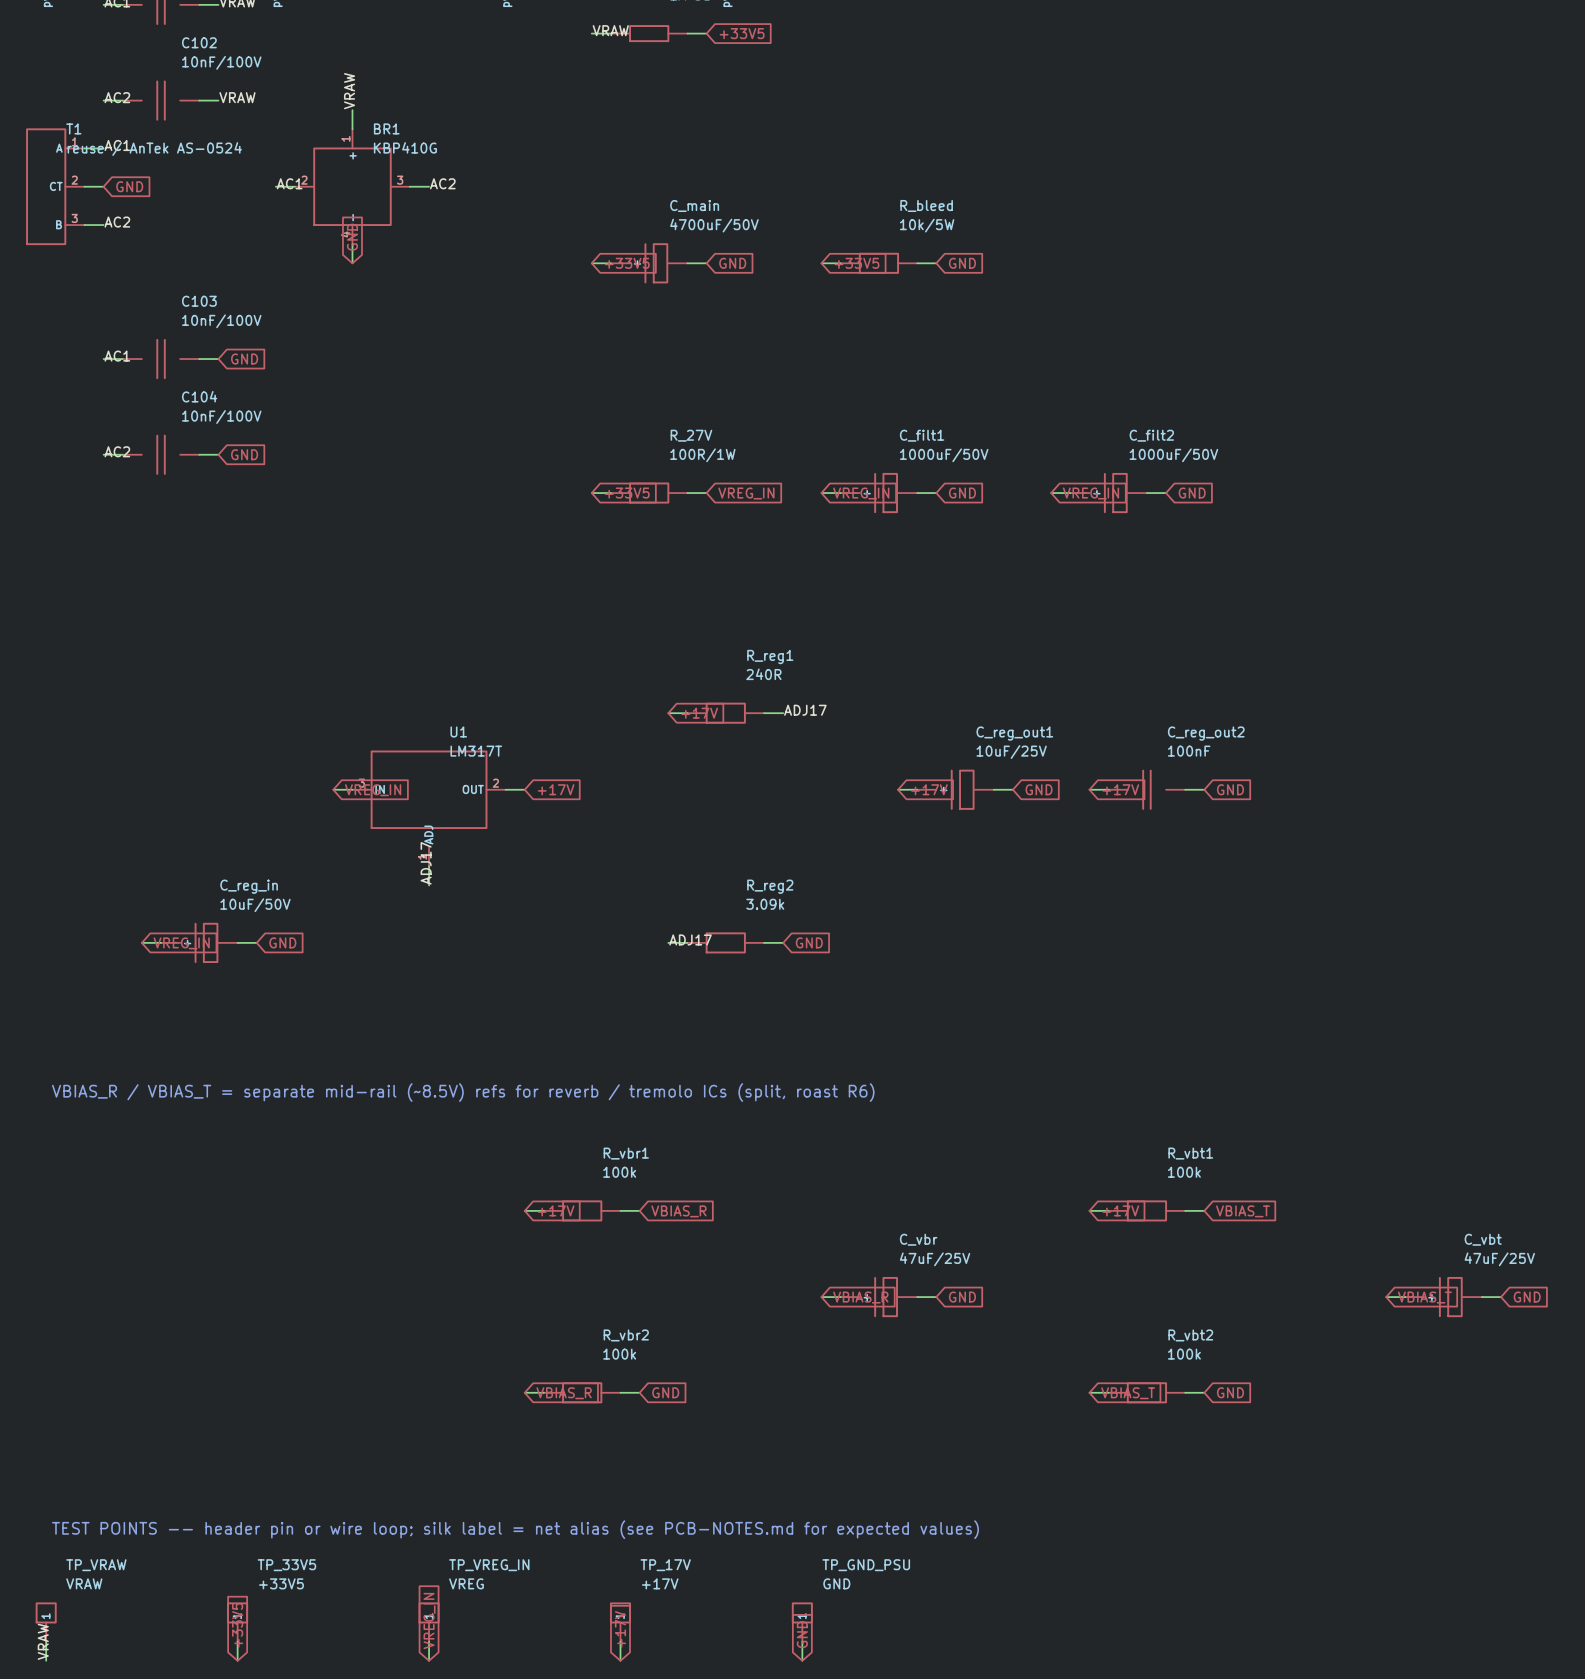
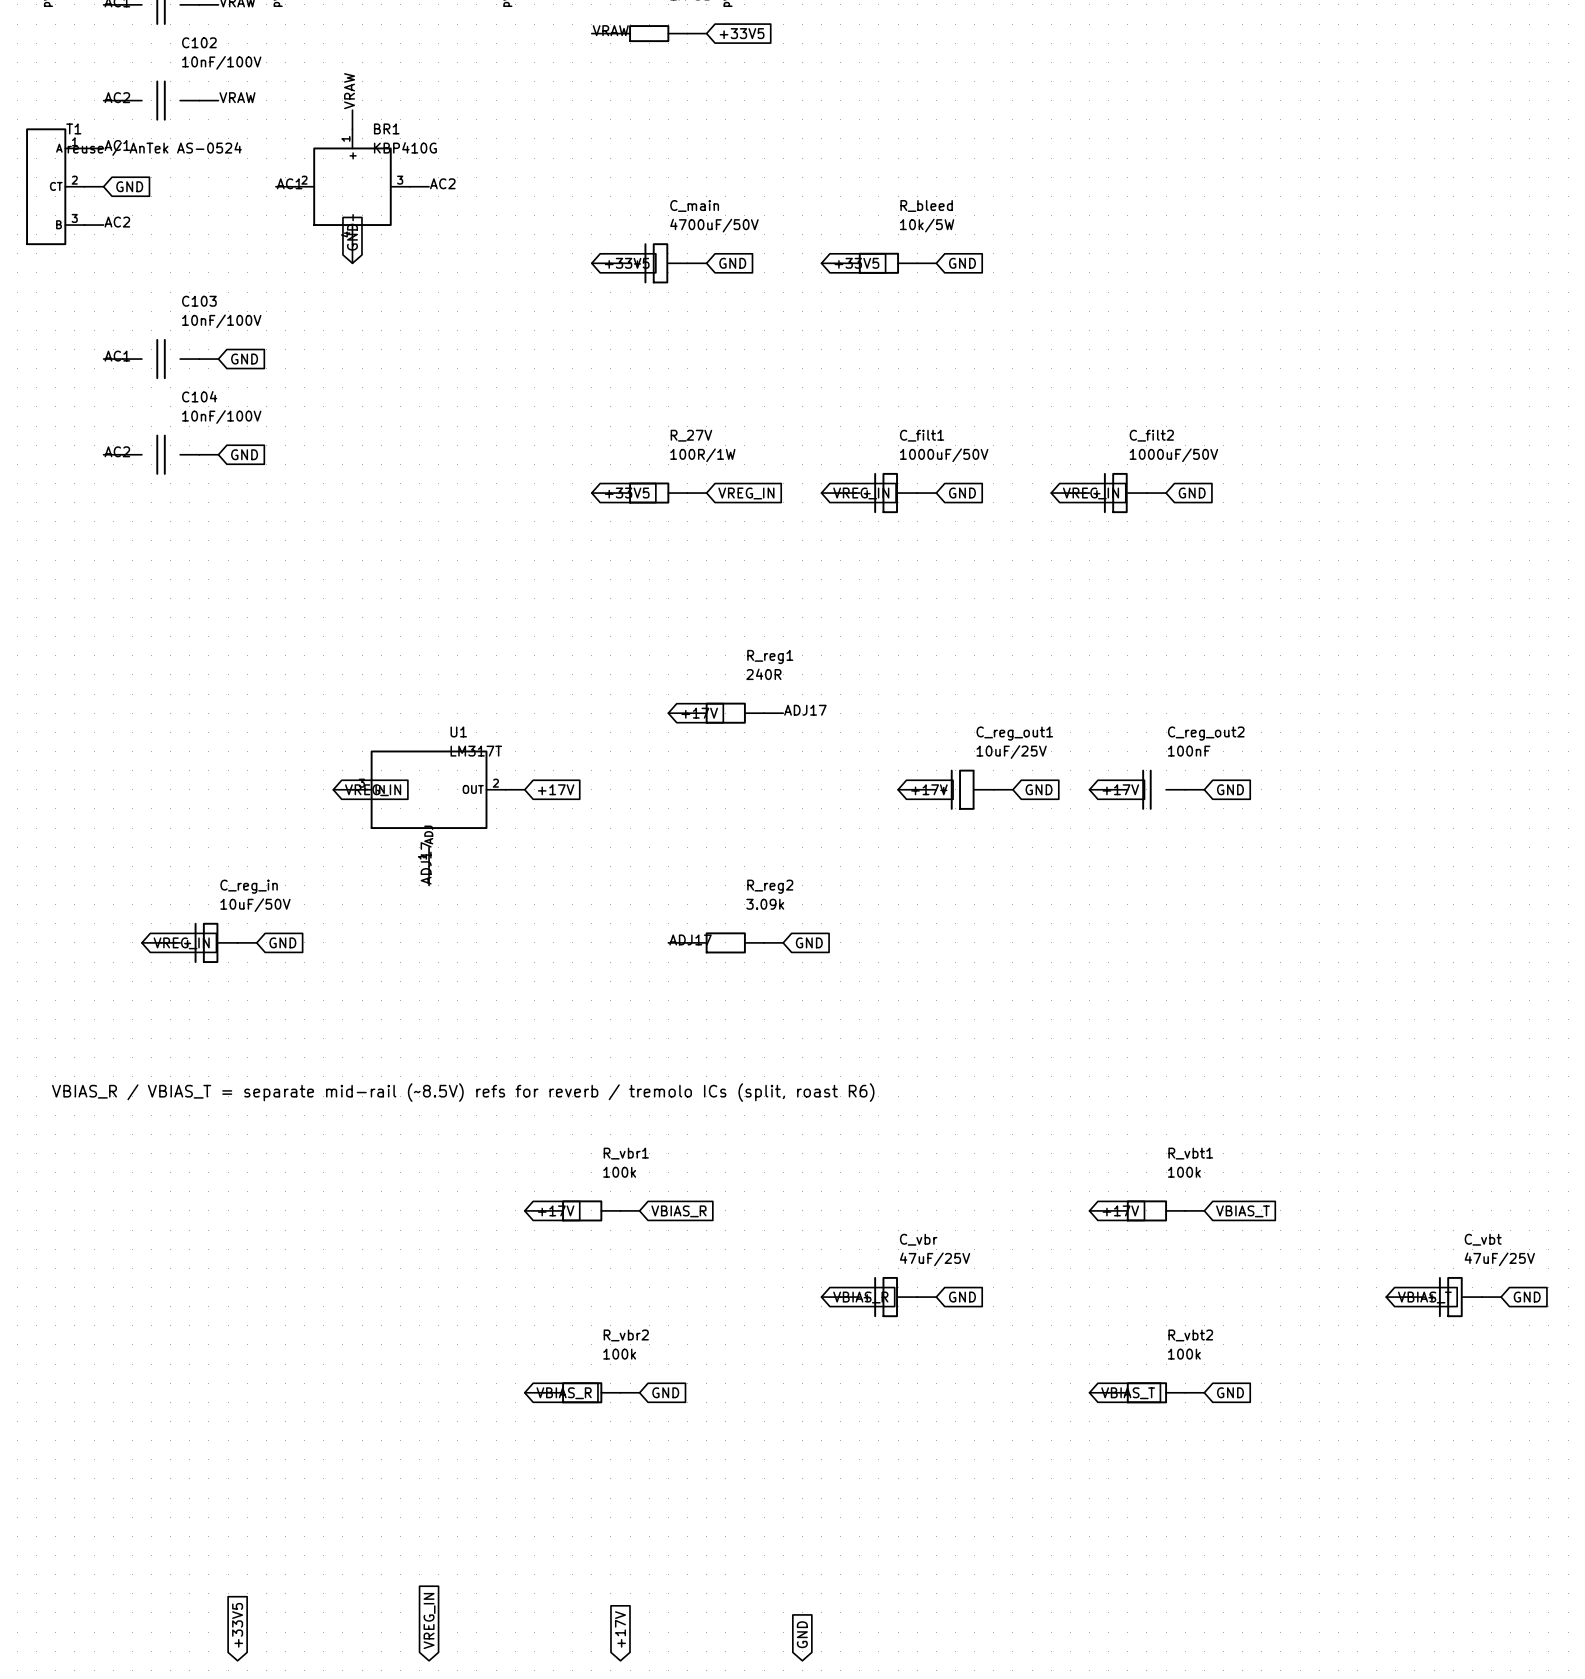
text: TEST POINTS -- header pin or wire loop; silk label = net alias (see PCB-NOTES.md for expected values) (515, 1529) -> none
TP_VRAW: VRAW (46, 1622) -> none
TP_33V5: +33V5 (237, 1622) -> none
TP_VREG_IN: VREG (429, 1622) -> none
TP_17V: +17V (620, 1622) -> none
TP_GND_PSU: GND (802, 1622) -> none
label: VRAW (43, 1641) -> none
wire: (46, 1641) (46, 1660) -> none
wire: (237, 1641) (237, 1660) -> none
wire: (429, 1641) (429, 1660) -> none
wire: (620, 1641) (620, 1660) -> none
wire: (802, 1641) (802, 1660) -> none

